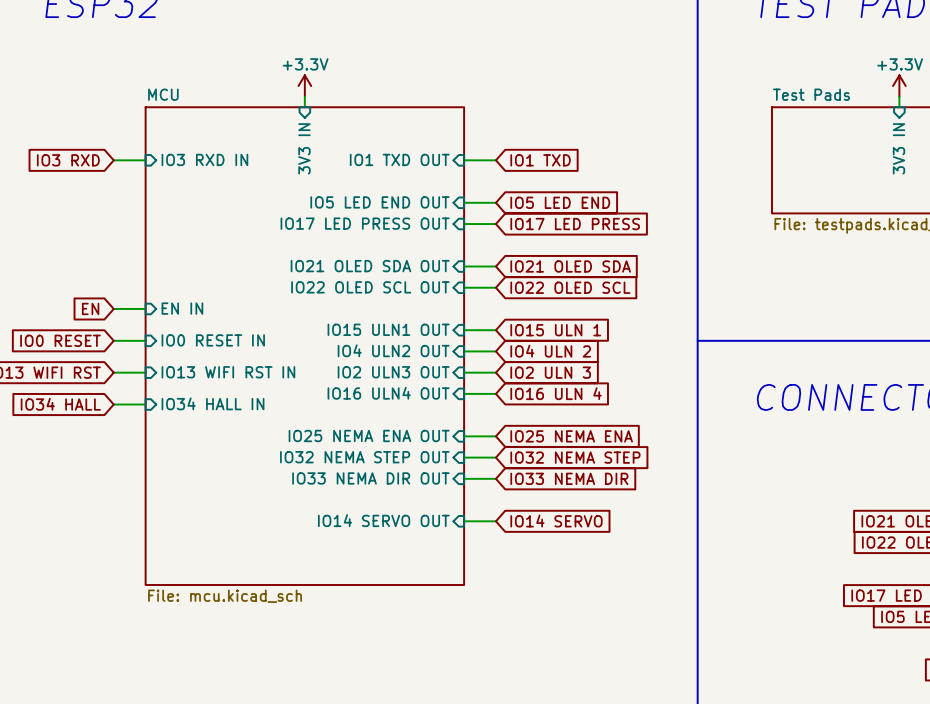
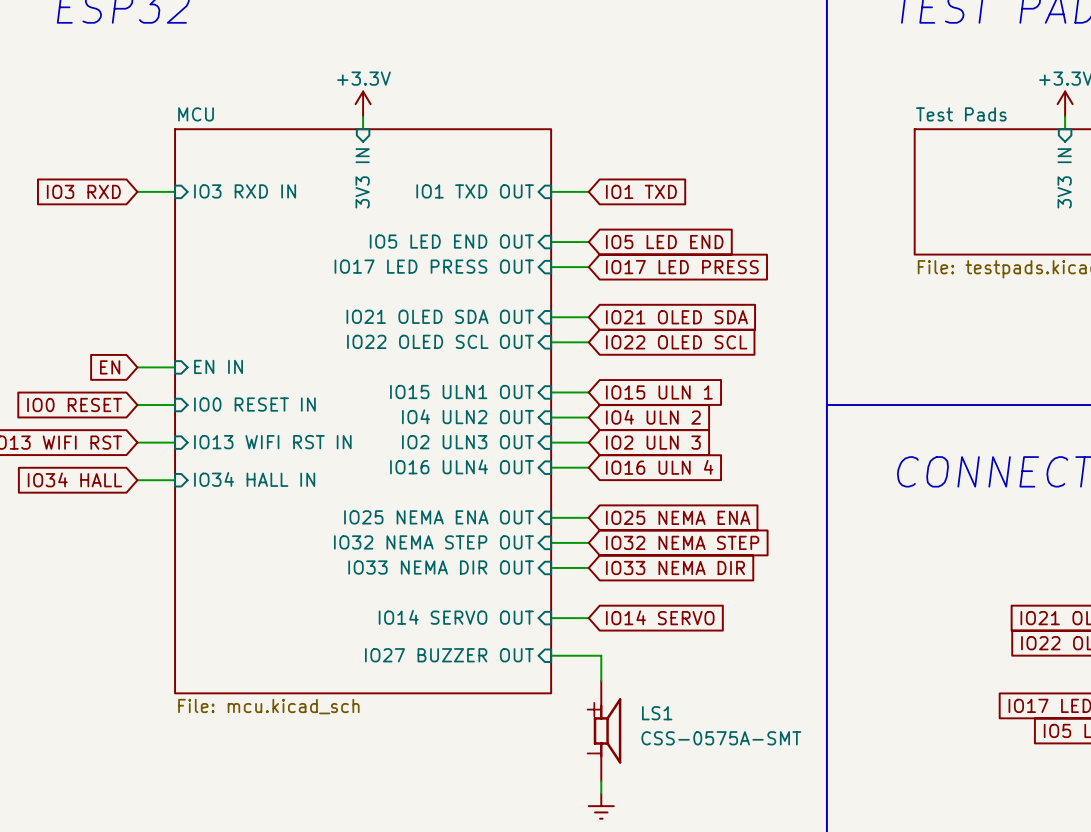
sheet pin: none -> IO27 BUZZER OUT (449, 655)
wire: none -> (551, 655) (601, 655) (601, 680)
LS1: none -> CSS-0575A-SMT (607, 730)
wire: none -> (601, 781) (601, 793)
power symbol: none -> (601, 806)

